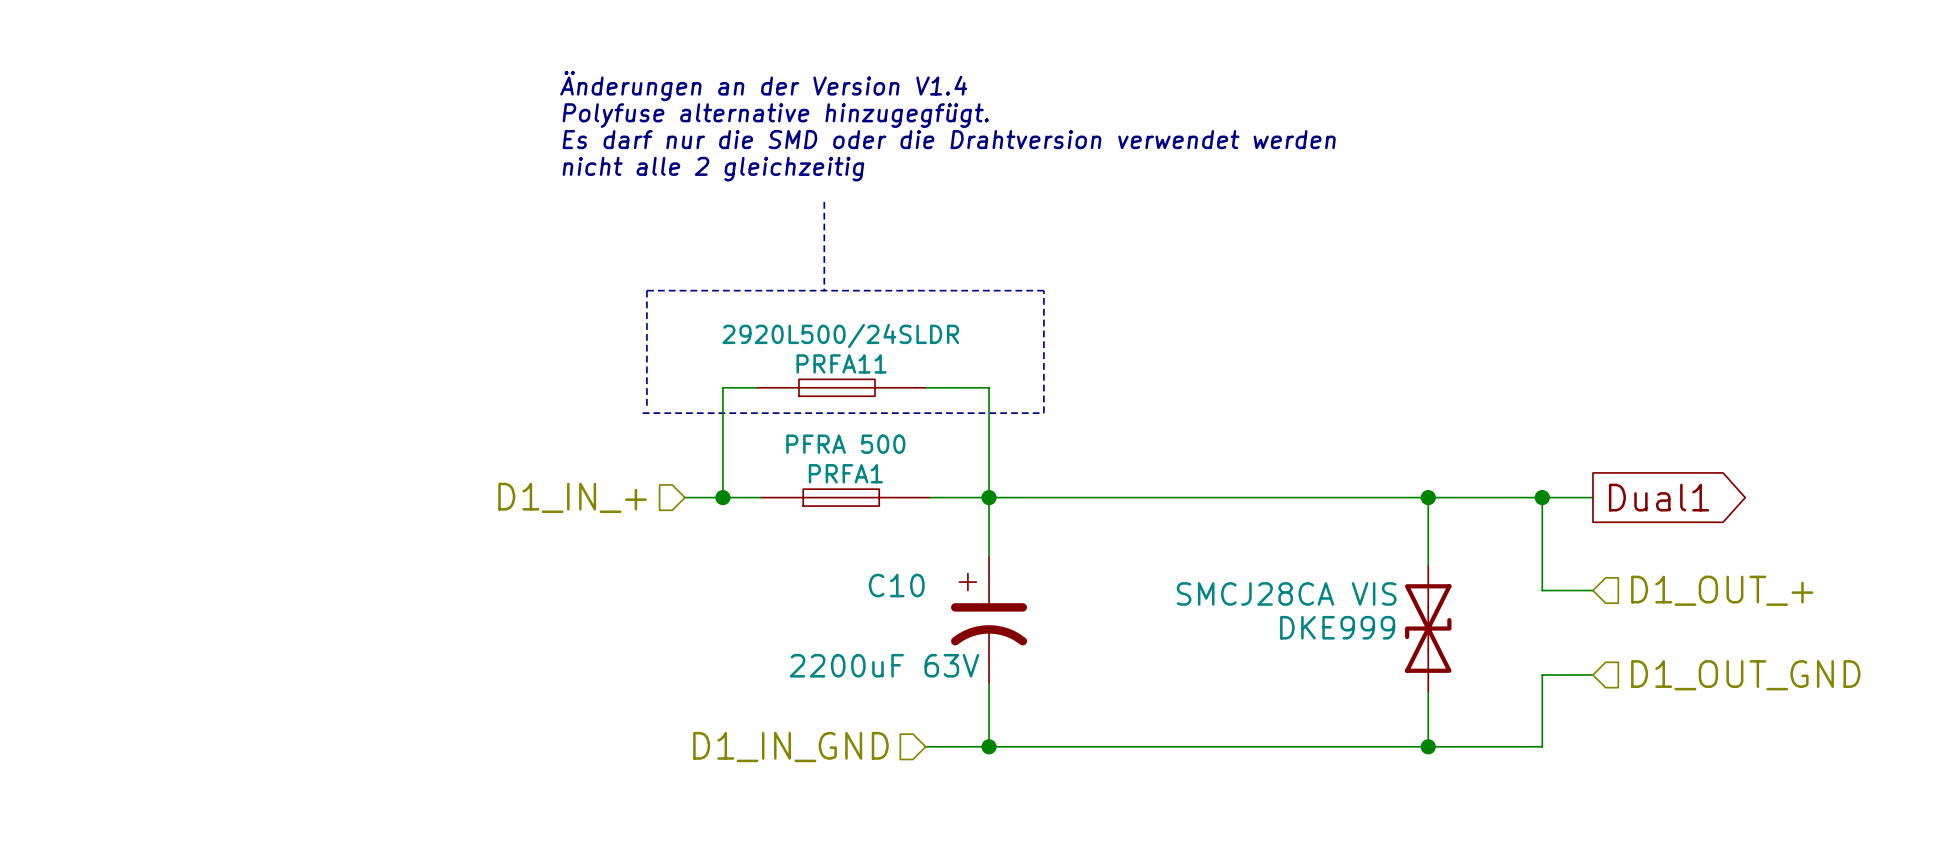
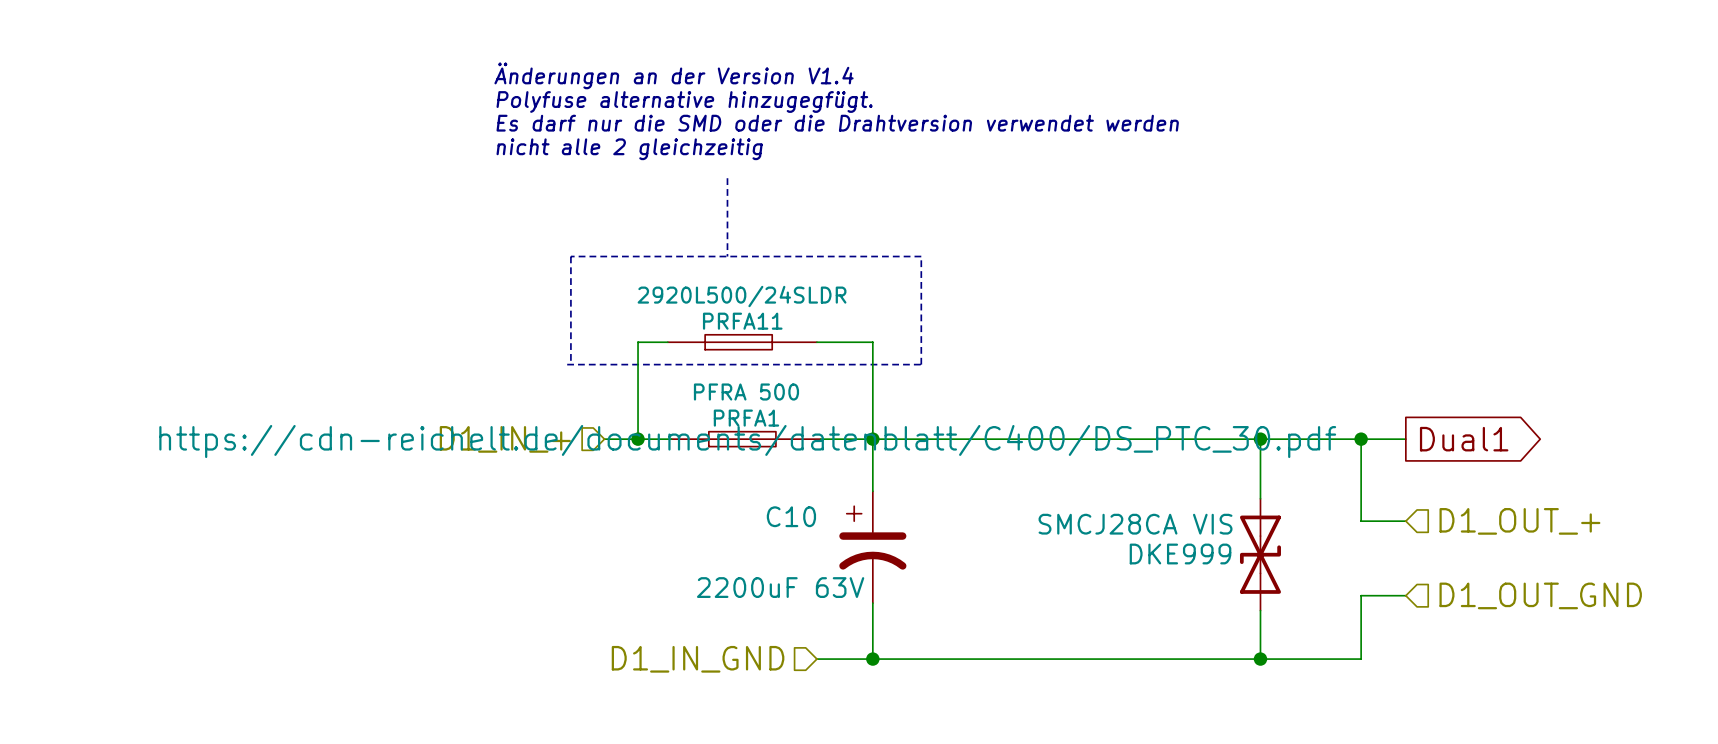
PRFA1 text: none -> https://cdn-reichelt.de/documents/datenblatt/C400/DS_PTC_30.pdf (747, 441)

